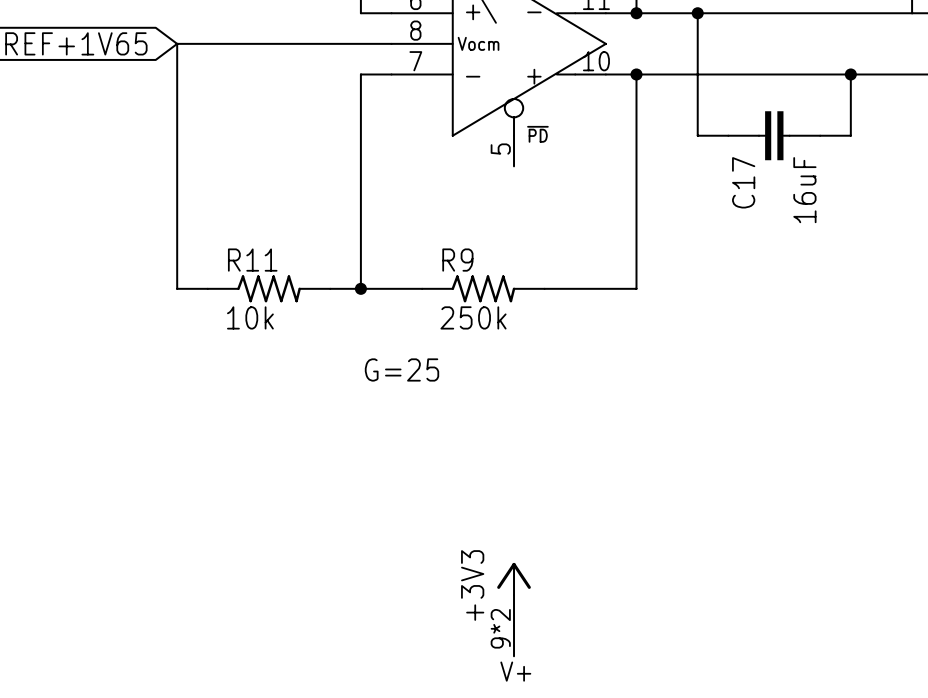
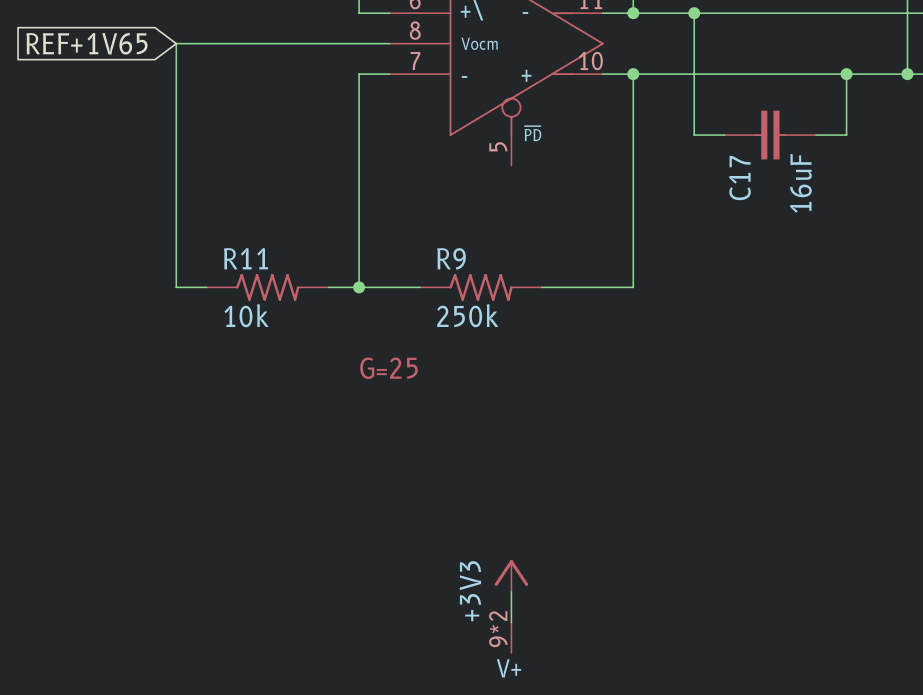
wire: none -> (907, 13) (907, 74)
junction: none -> (907, 74)

